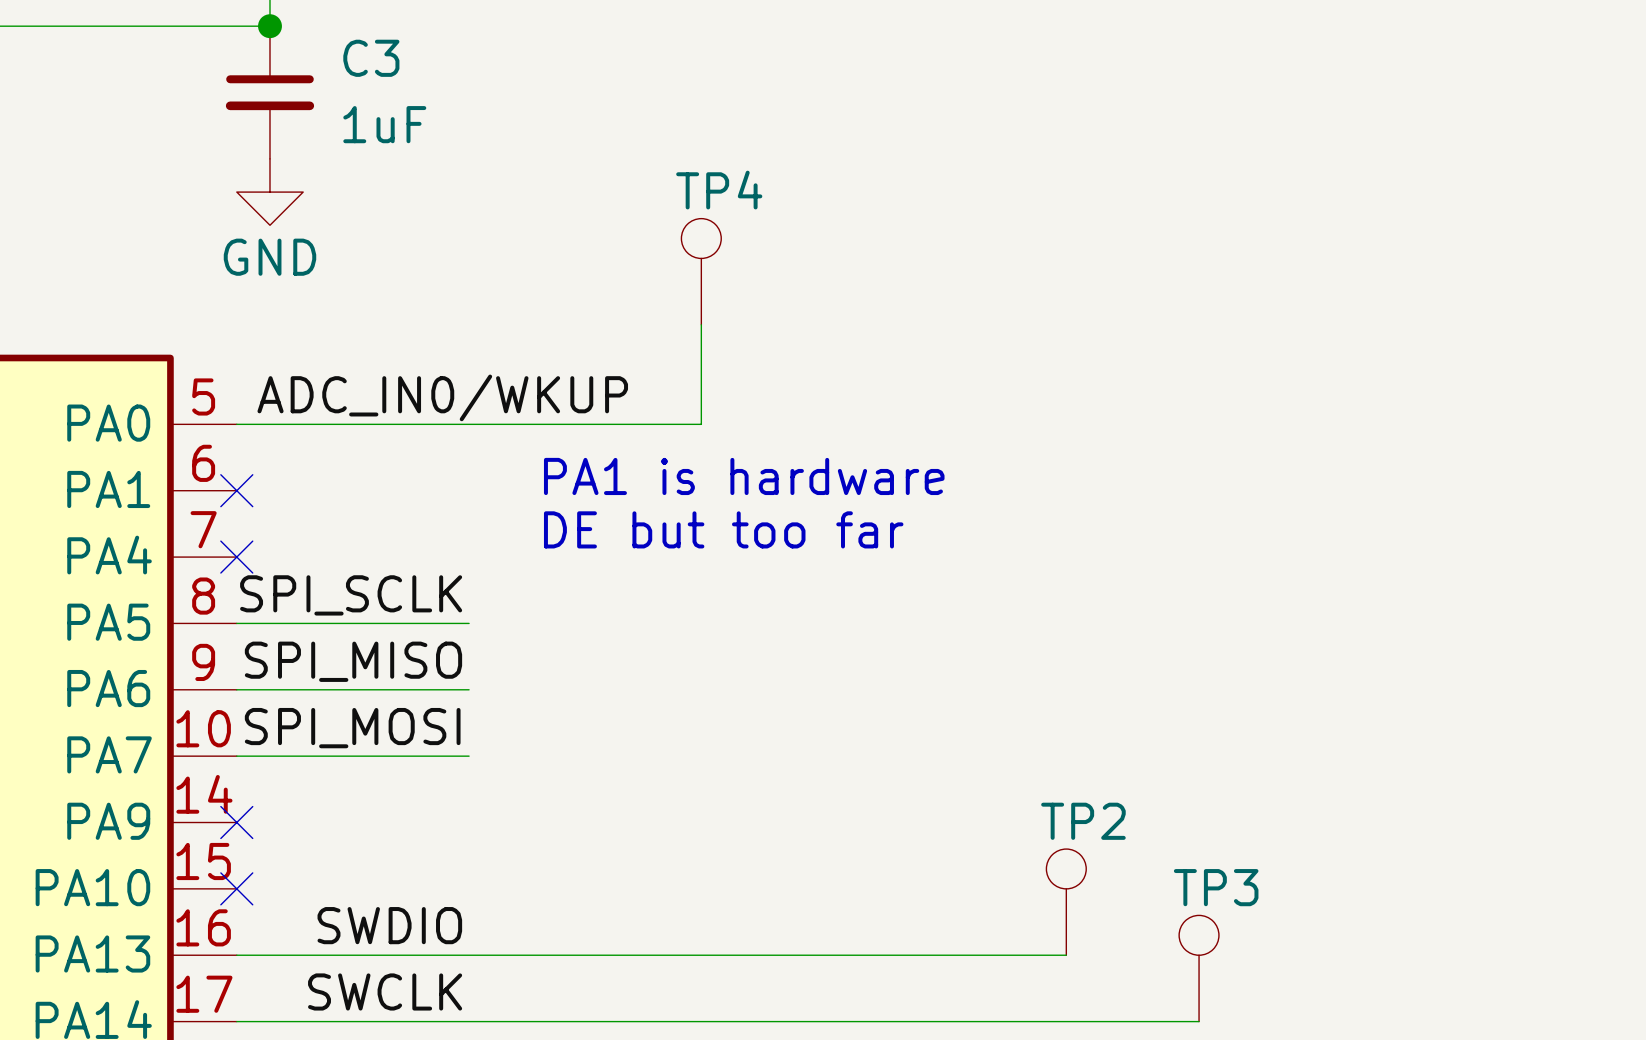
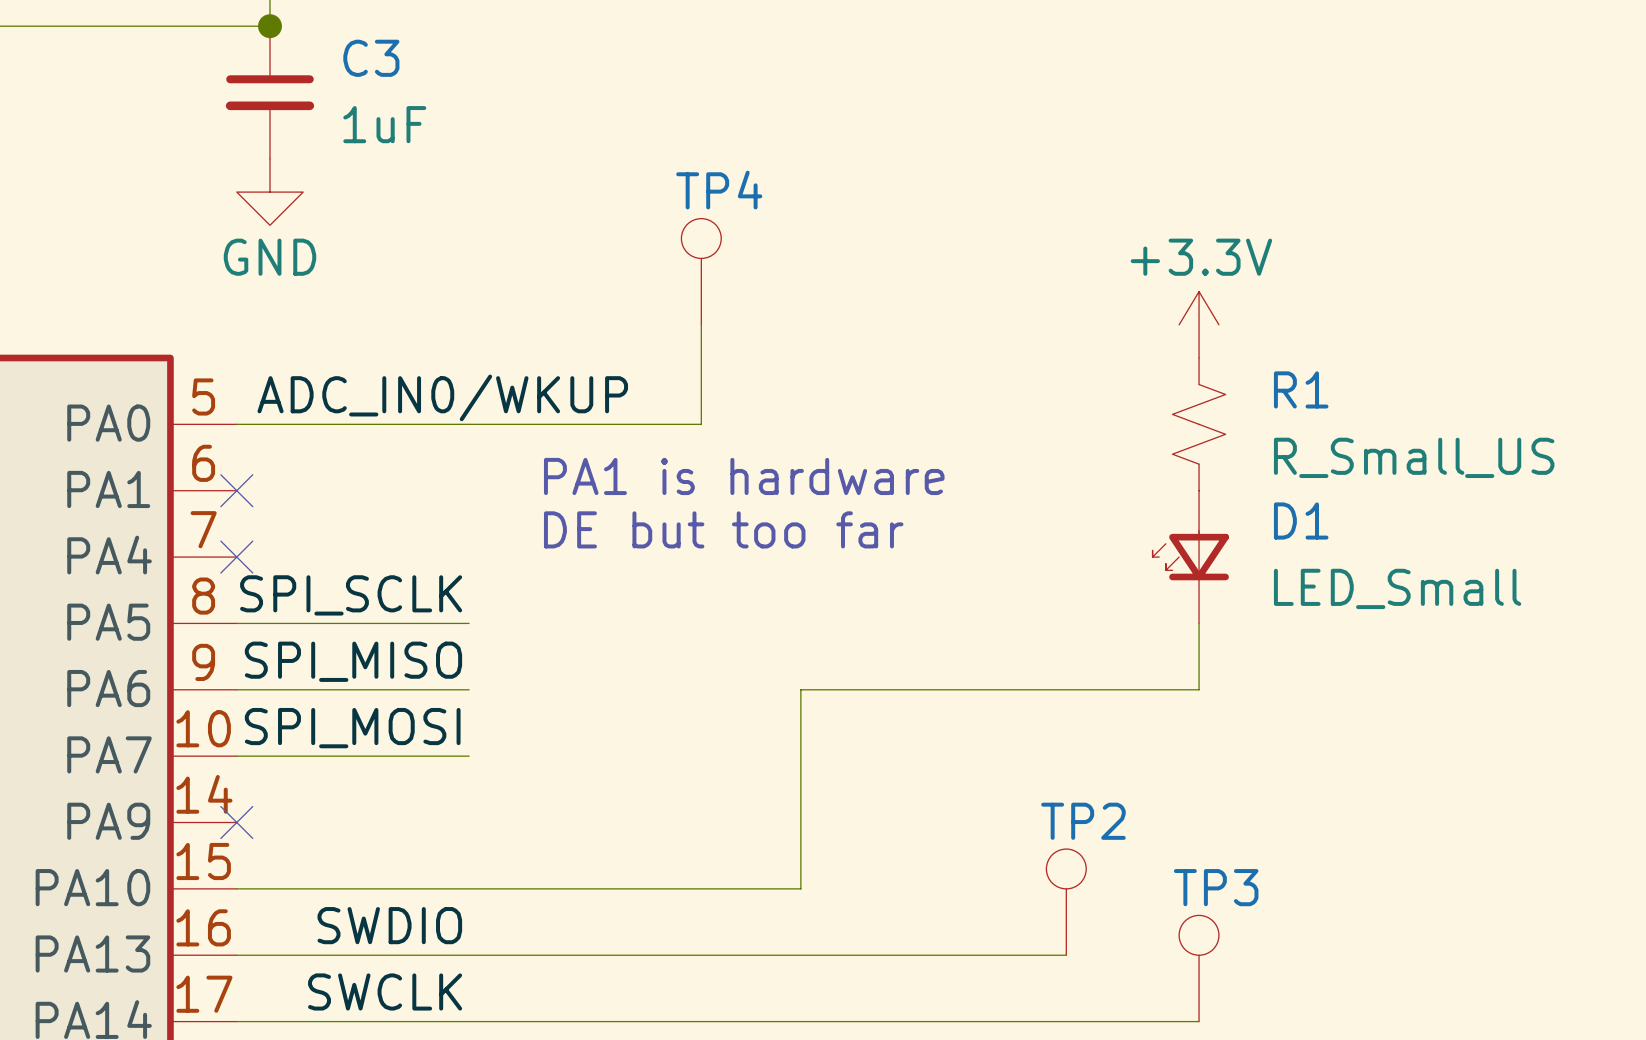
power symbol: none -> +3.3V (1199, 324)
R1: none -> R_Small_US (1199, 424)
D1: none -> LED_Small (1190, 557)
wire: none -> (1199, 623) (1199, 689) (800, 689) (800, 888) (236, 888)
no-connect mark: (236, 888) -> none

